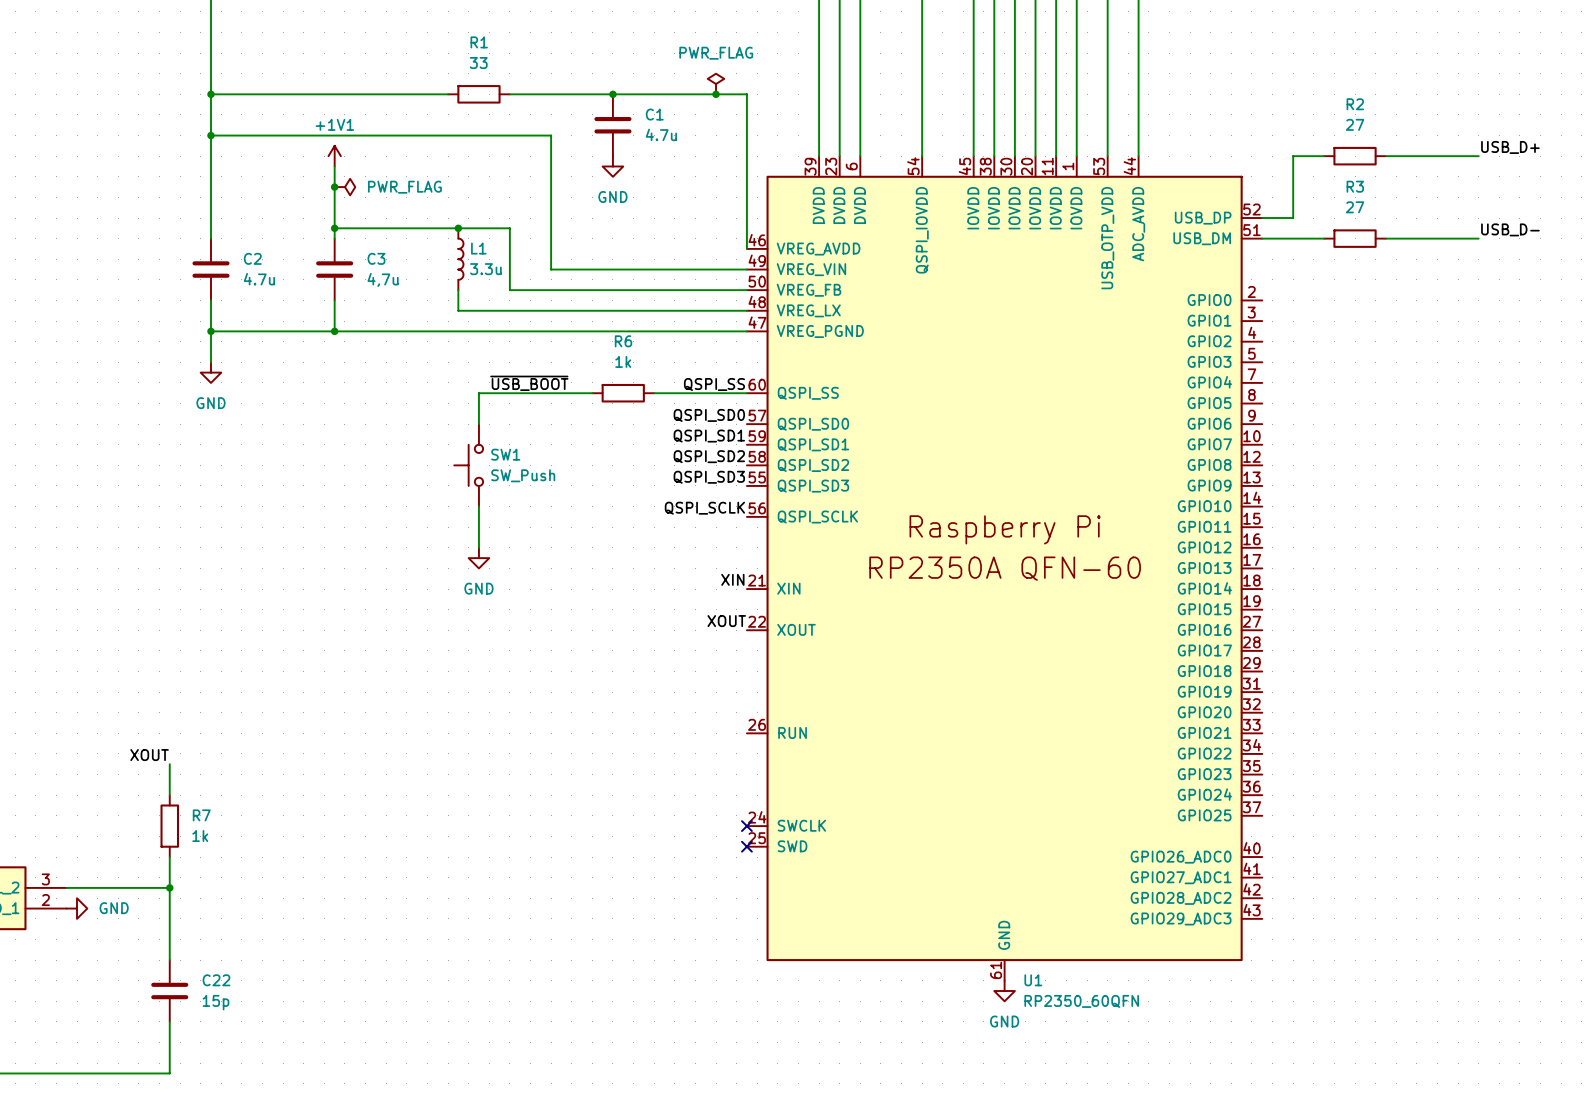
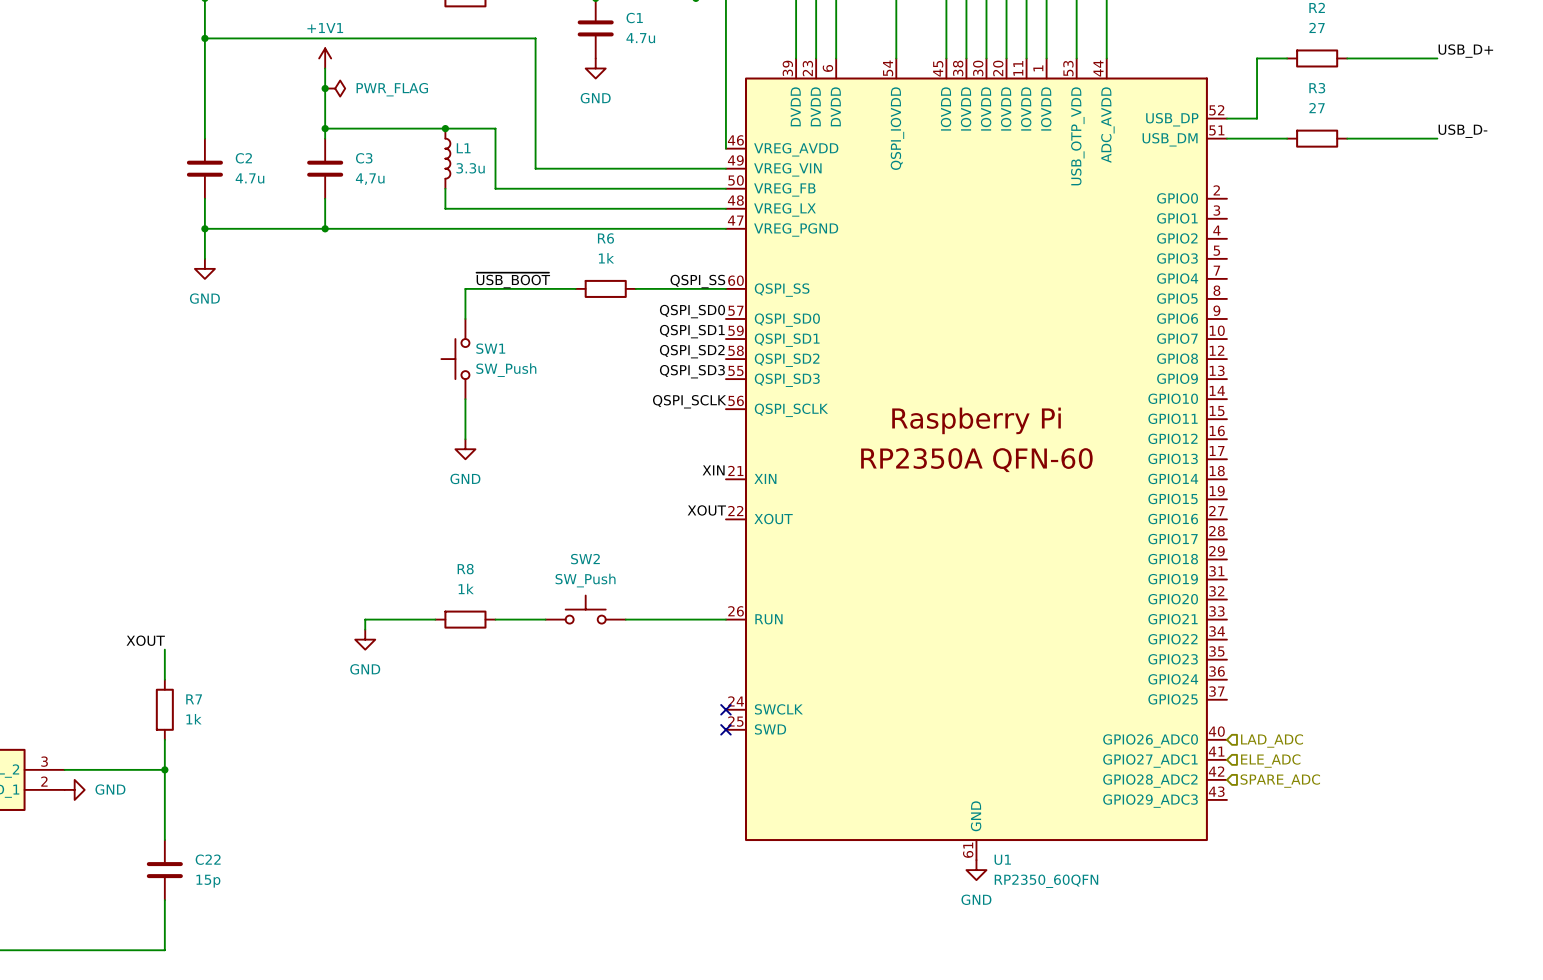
SW2: none -> SW_Push (585, 609)
wire: none -> (435, 619) (365, 619) (365, 629)
R8: none -> 1k (465, 619)
wire: none -> (495, 619) (545, 619)
wire: none -> (625, 619) (725, 619)
power symbol: none -> GND (365, 639)
hierarchical label: none -> LAD_ADC (1272, 740)
hierarchical label: none -> ELE_ADC (1270, 761)
hierarchical label: none -> SPARE_ADC (1280, 781)

